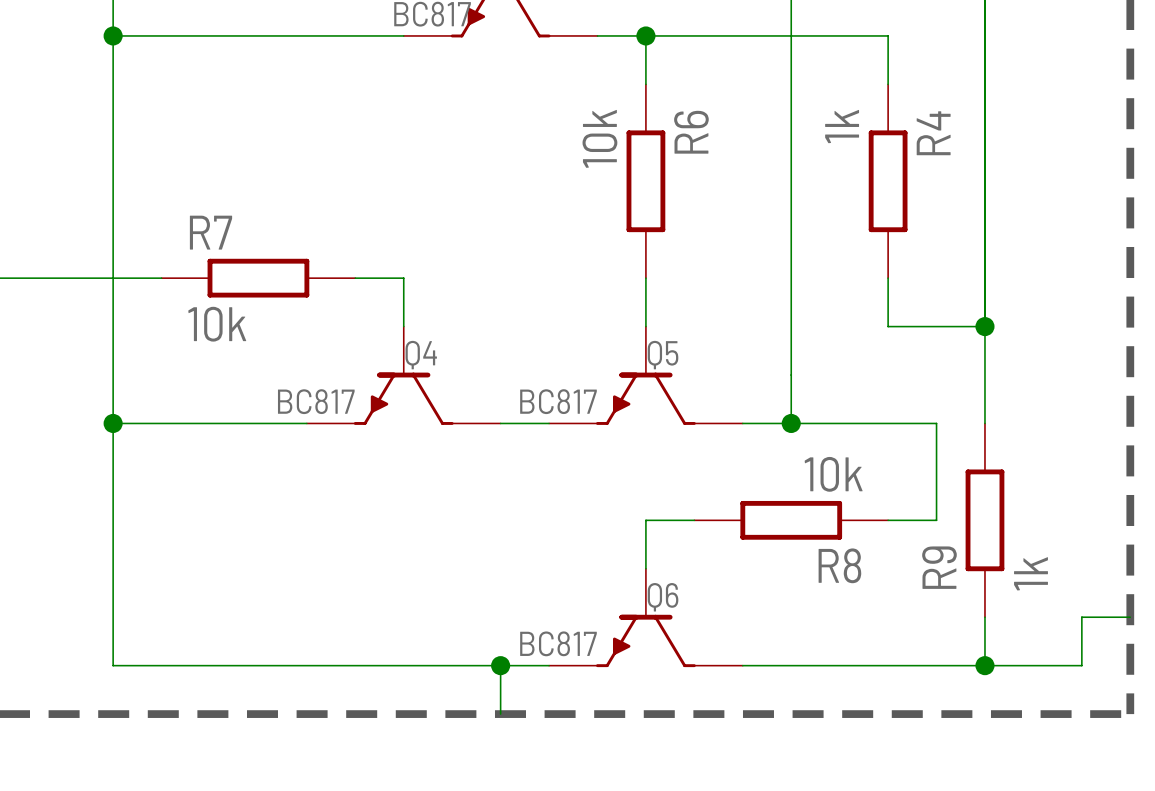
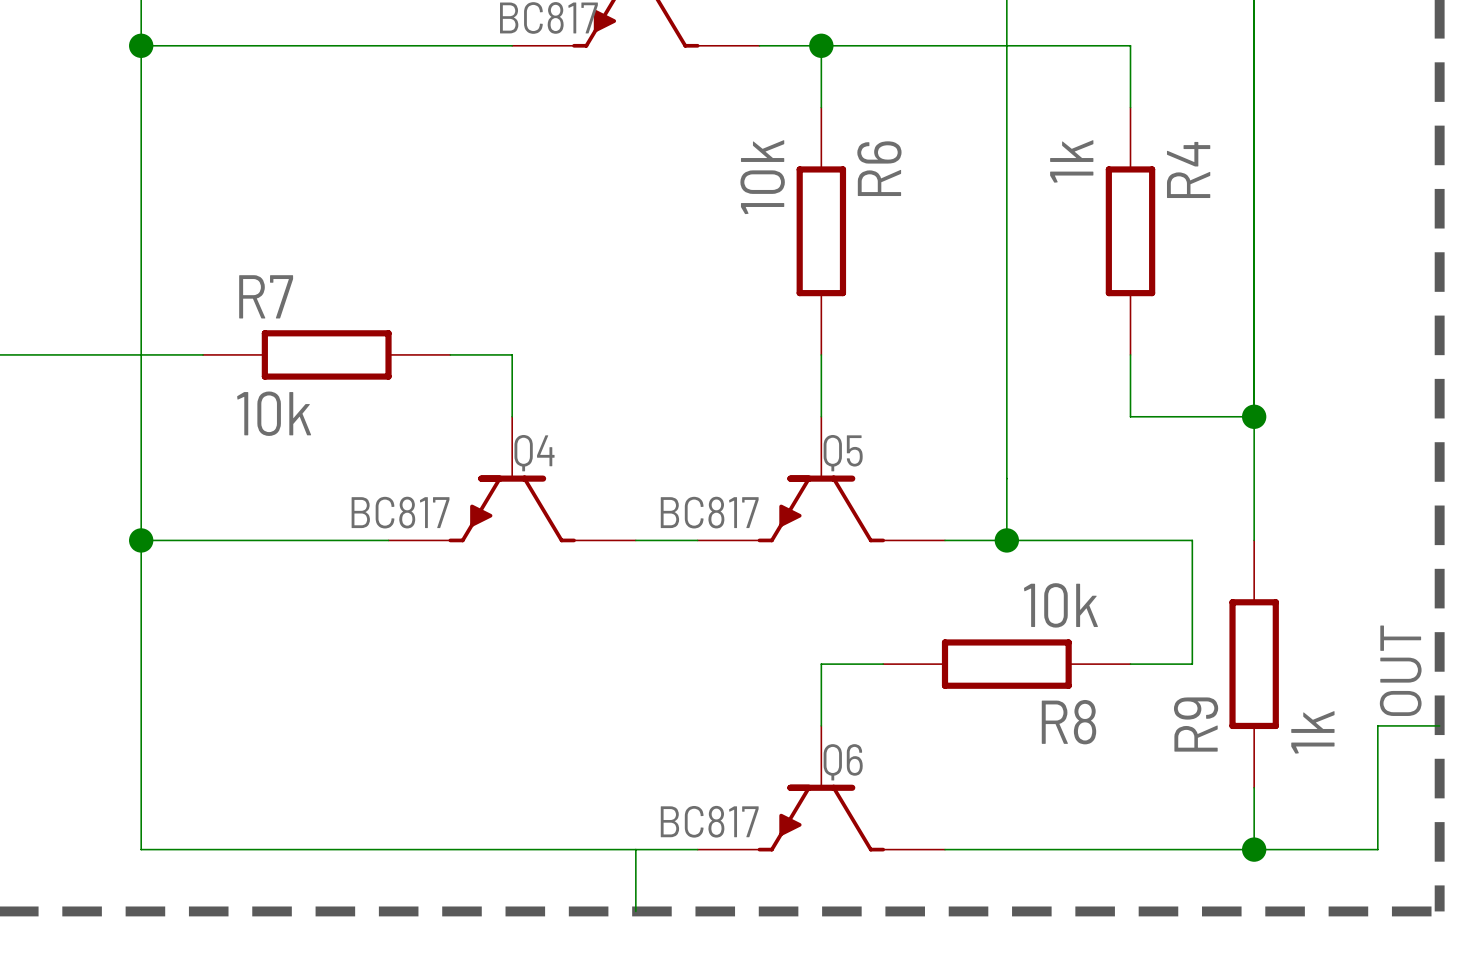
label: none -> OUT (1400, 670)
wire: (1081, 617) (1130, 617) -> (1377, 787) (1377, 725) (1439, 725)
junction: (500, 665) -> none

